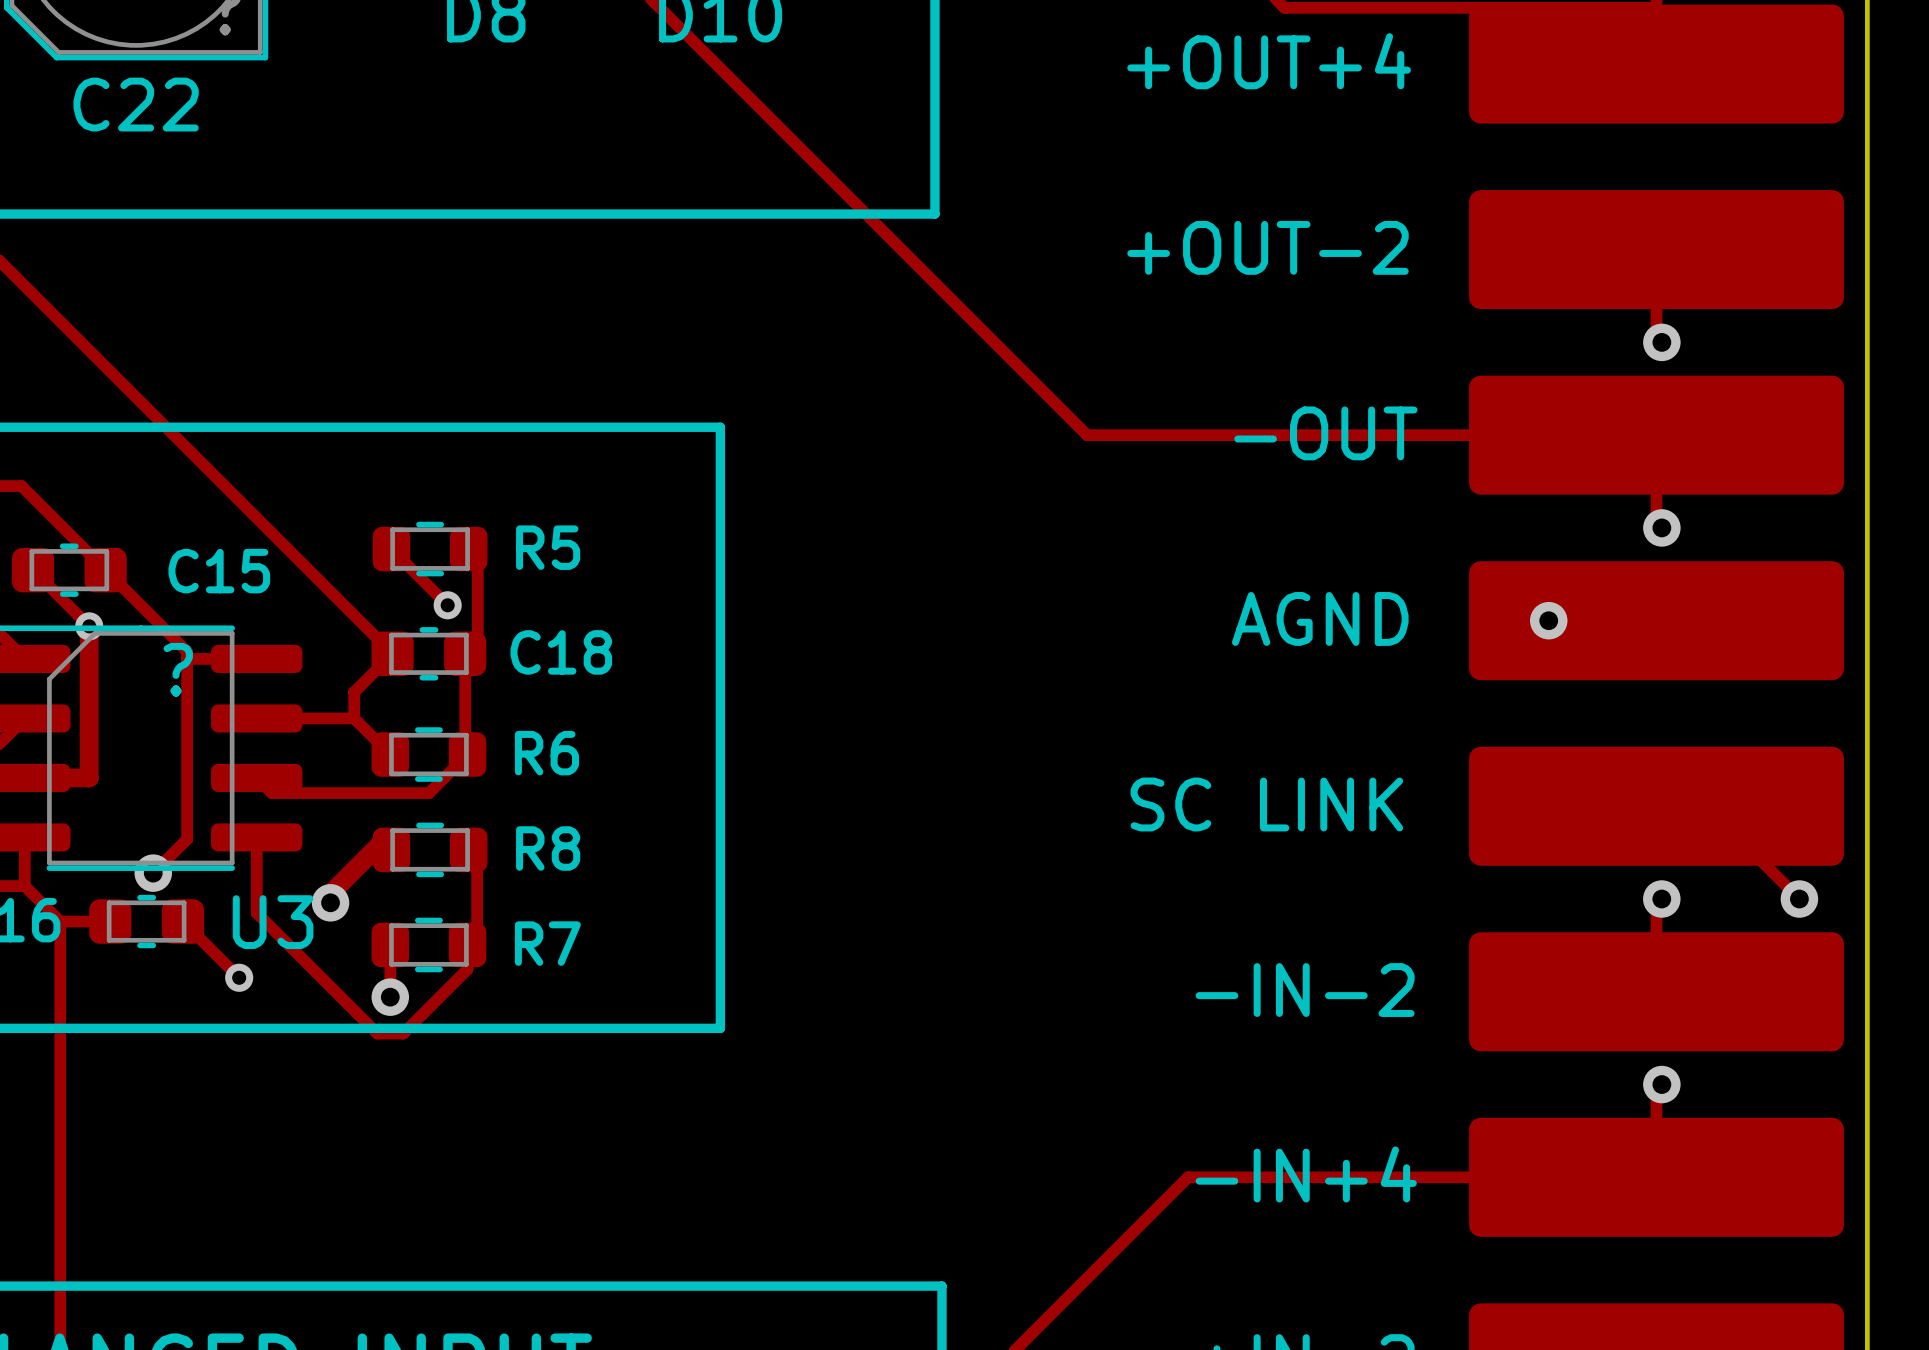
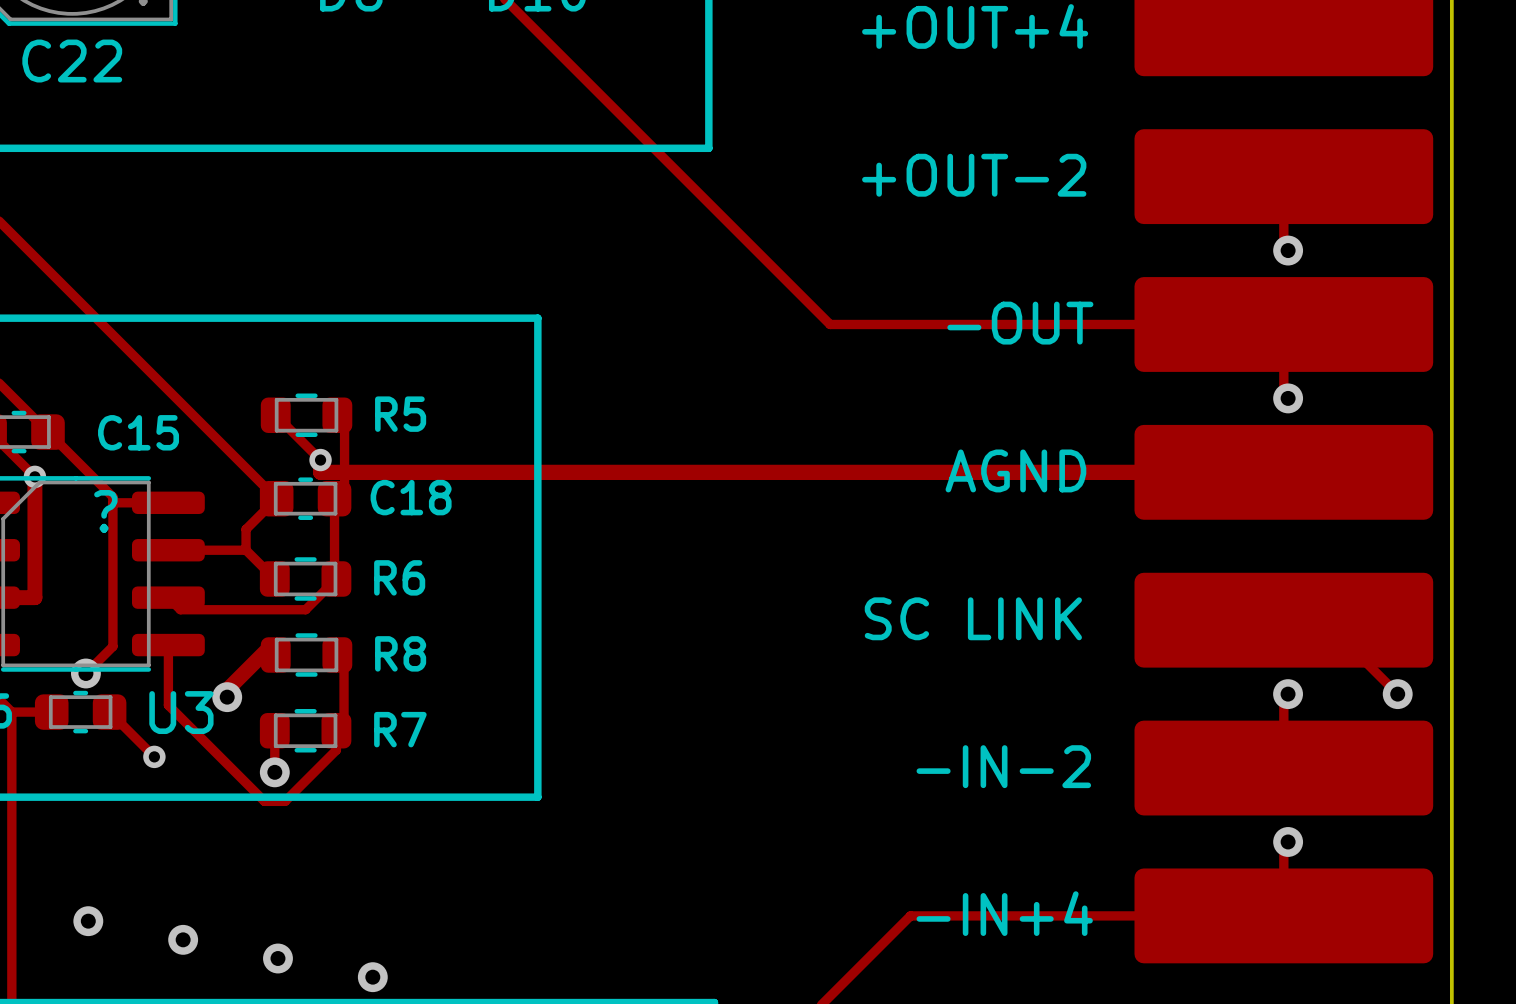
track: none -> (320, 460) (320, 472) (1197, 472)
via: (1548, 620) -> none
via: none -> (88, 921)
via: none -> (183, 939)
via: none -> (277, 958)
via: none -> (372, 977)

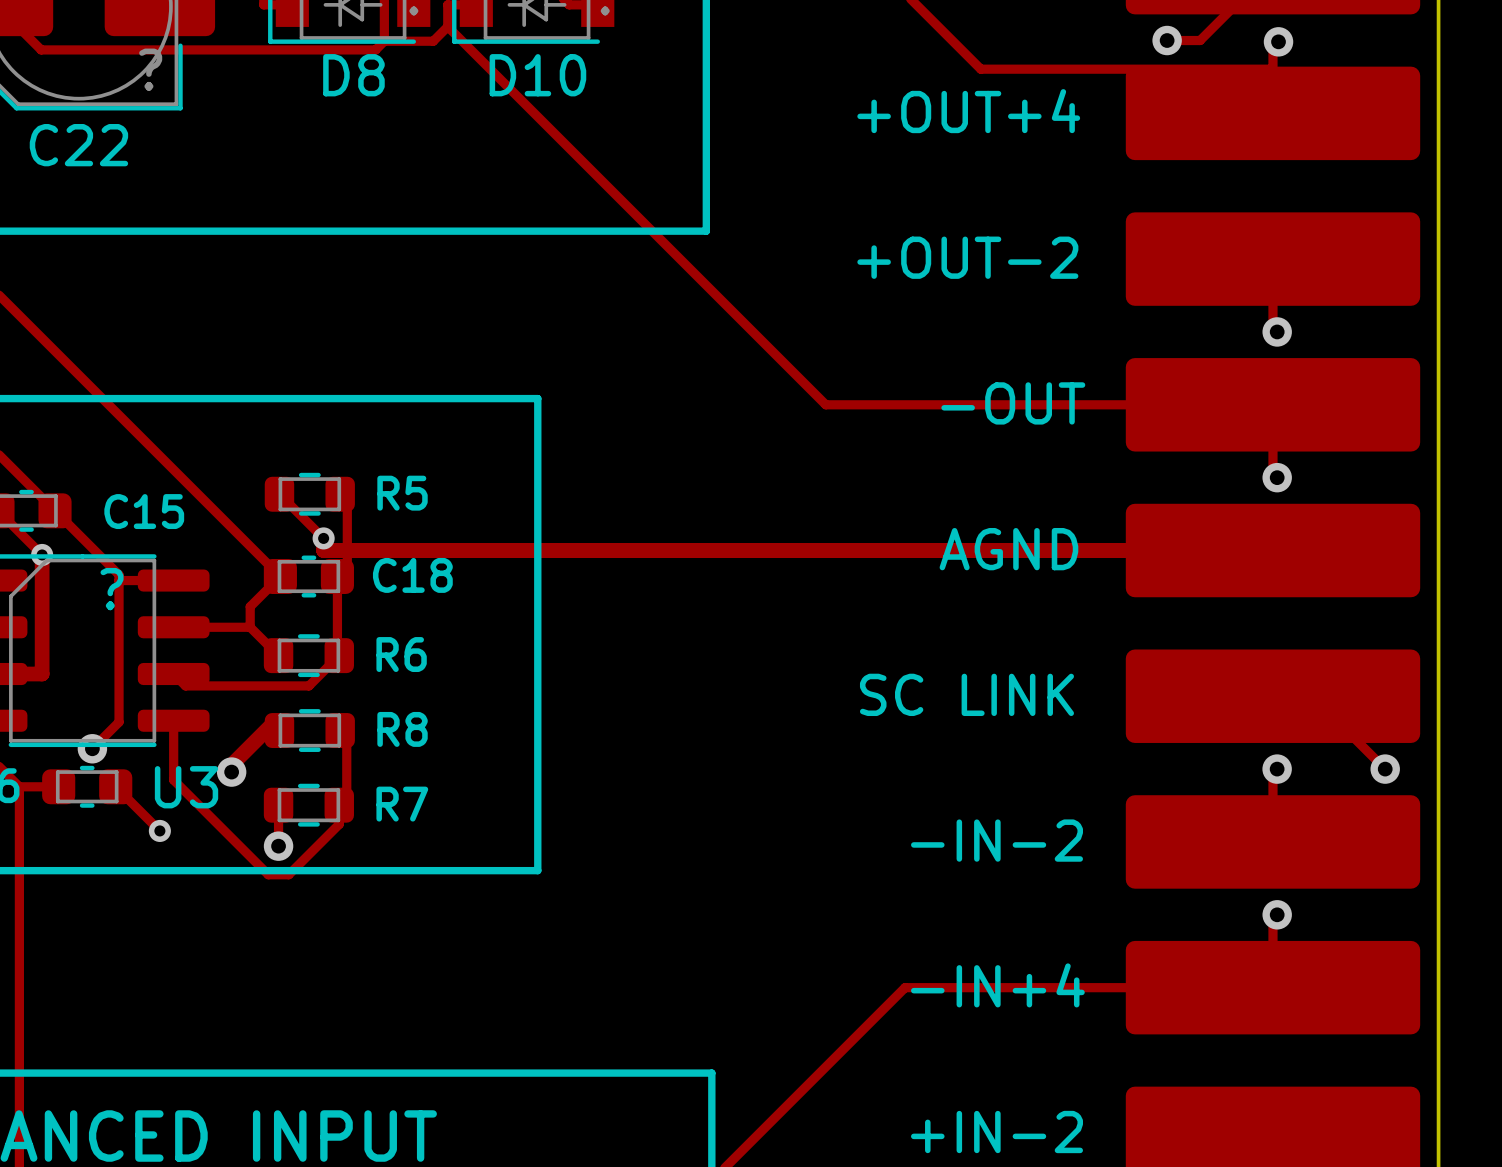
via: (88, 921) -> none
via: (183, 939) -> none
via: (277, 958) -> none
via: (372, 977) -> none

